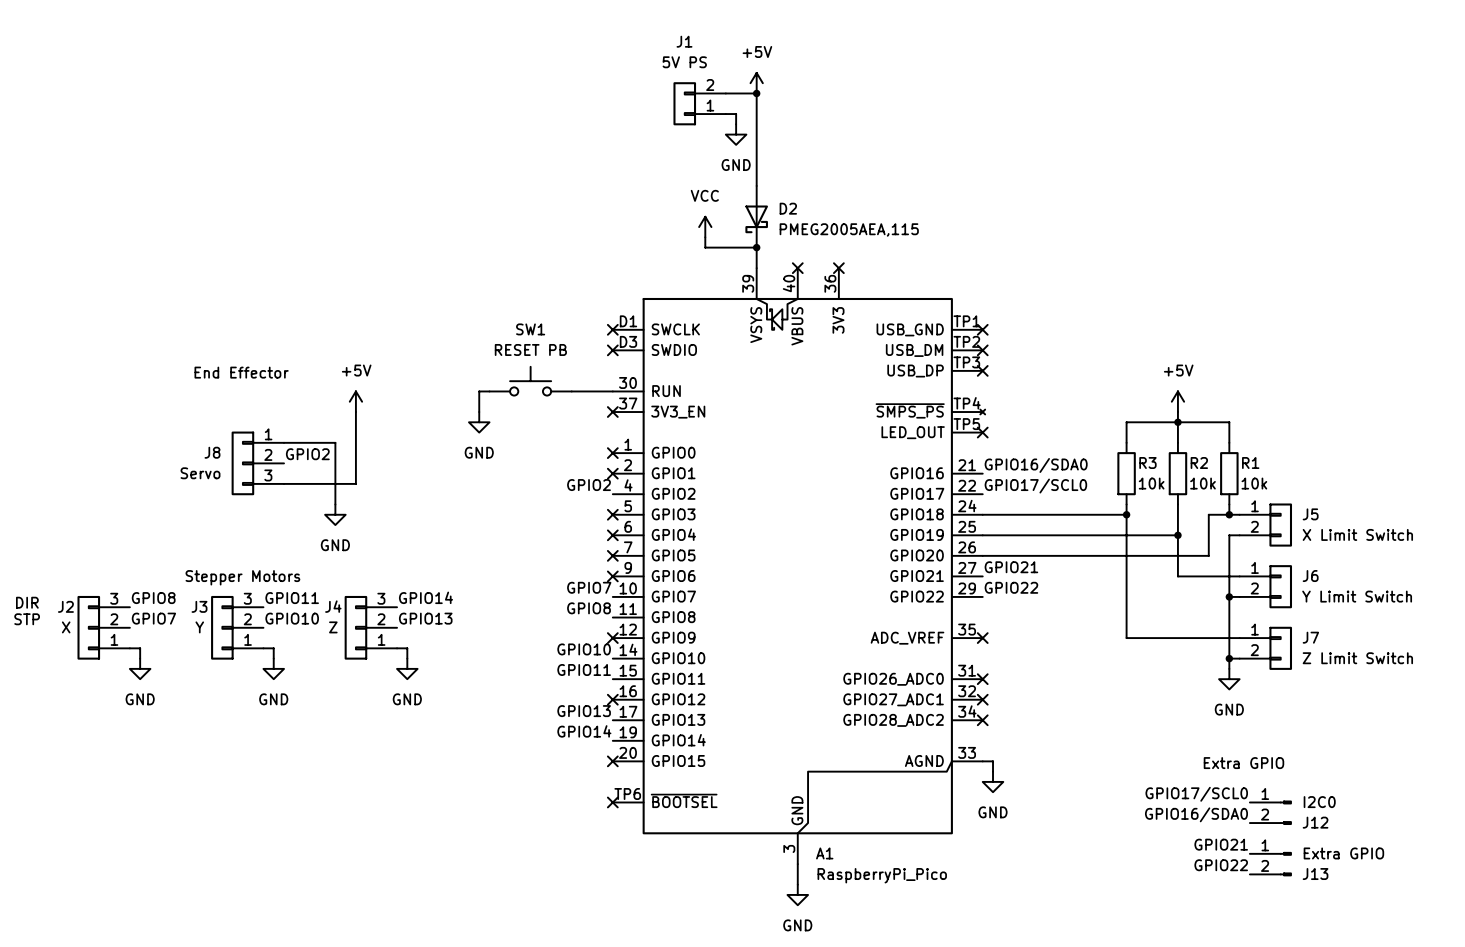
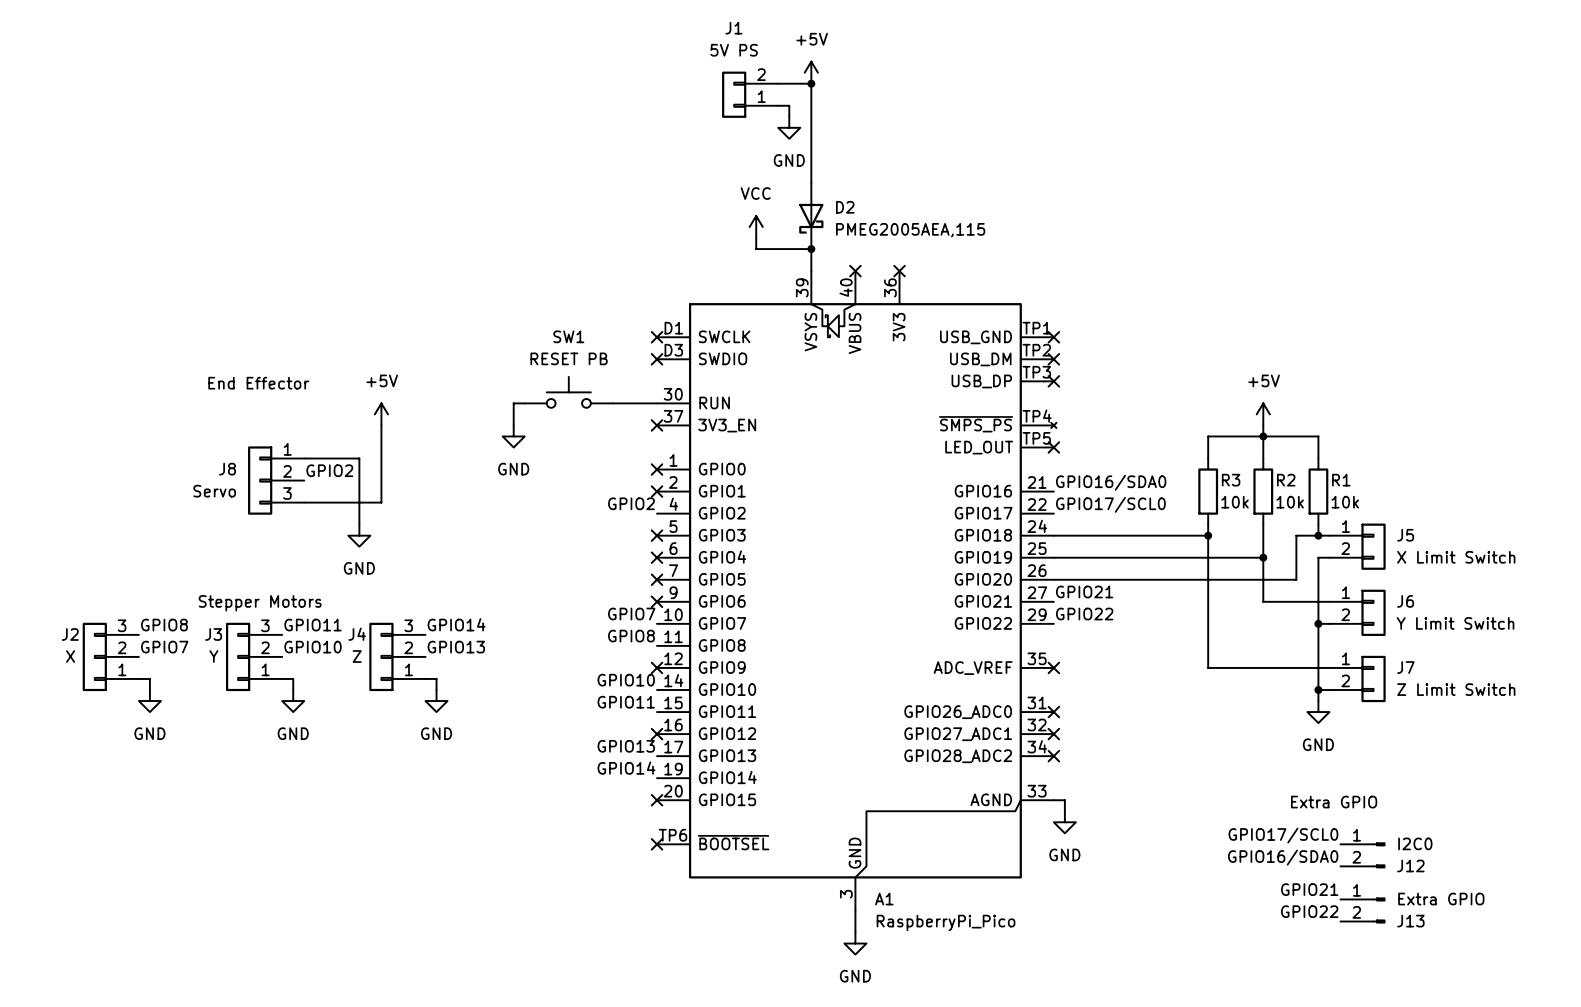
text: DIR (27, 602) -> none
text: STP (27, 619) -> none

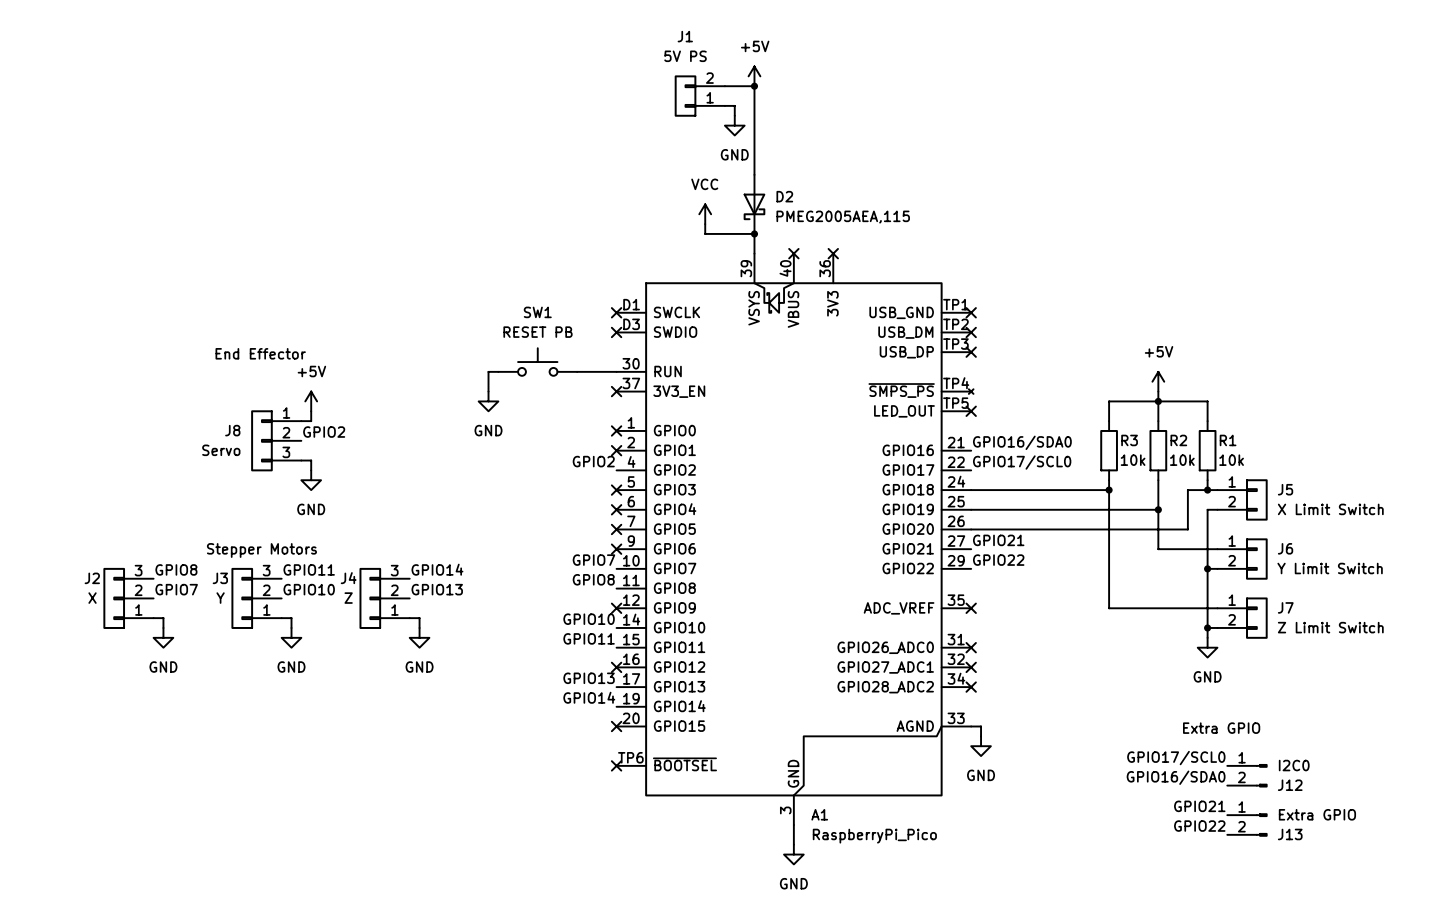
power symbol position: +5V (381, 414) -> +5V (311, 401)
wire: (381, 425) (381, 502) (315, 502) -> (311, 470) (311, 460)
wire: (315, 458) (359, 458) (359, 524) -> (311, 421) (311, 411)
power symbol position: GND (359, 535) -> GND (311, 480)

